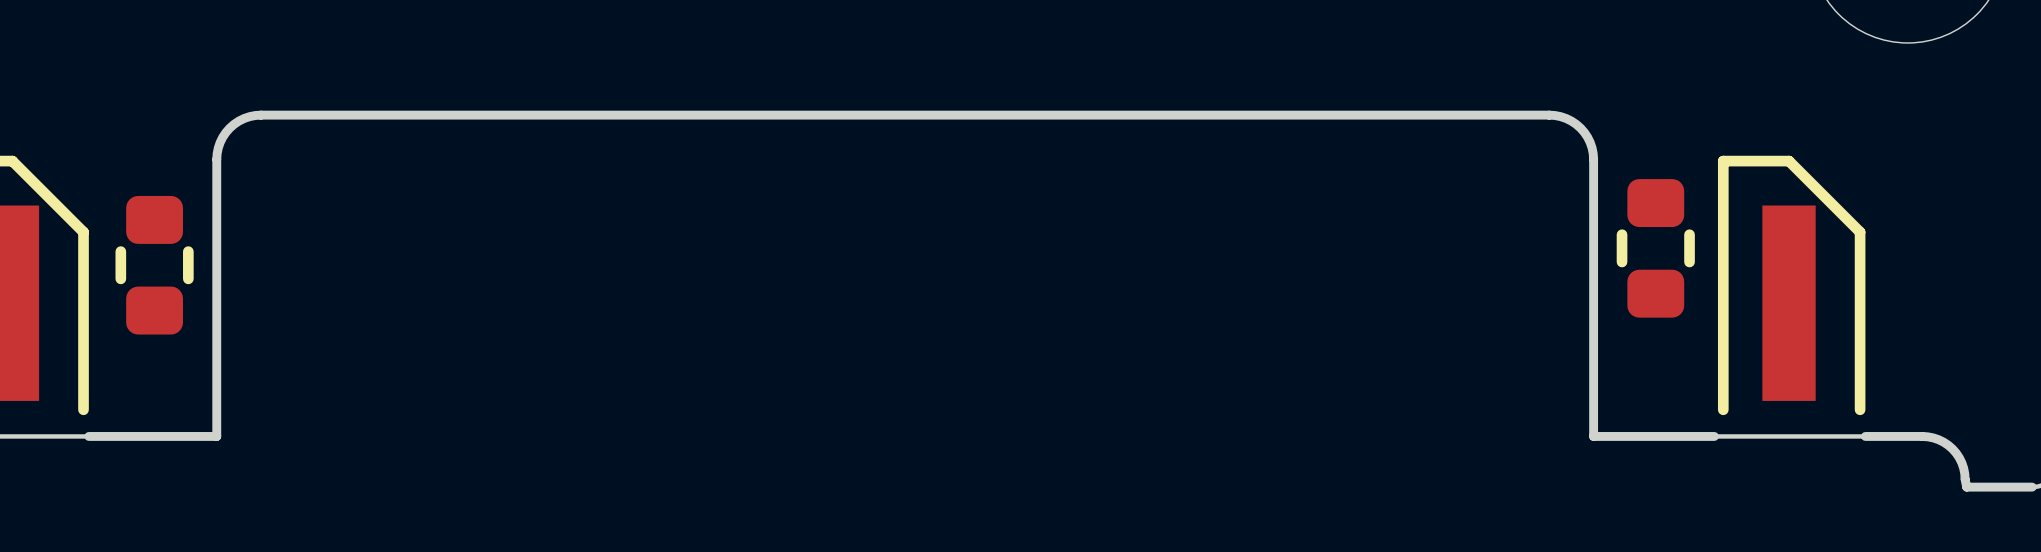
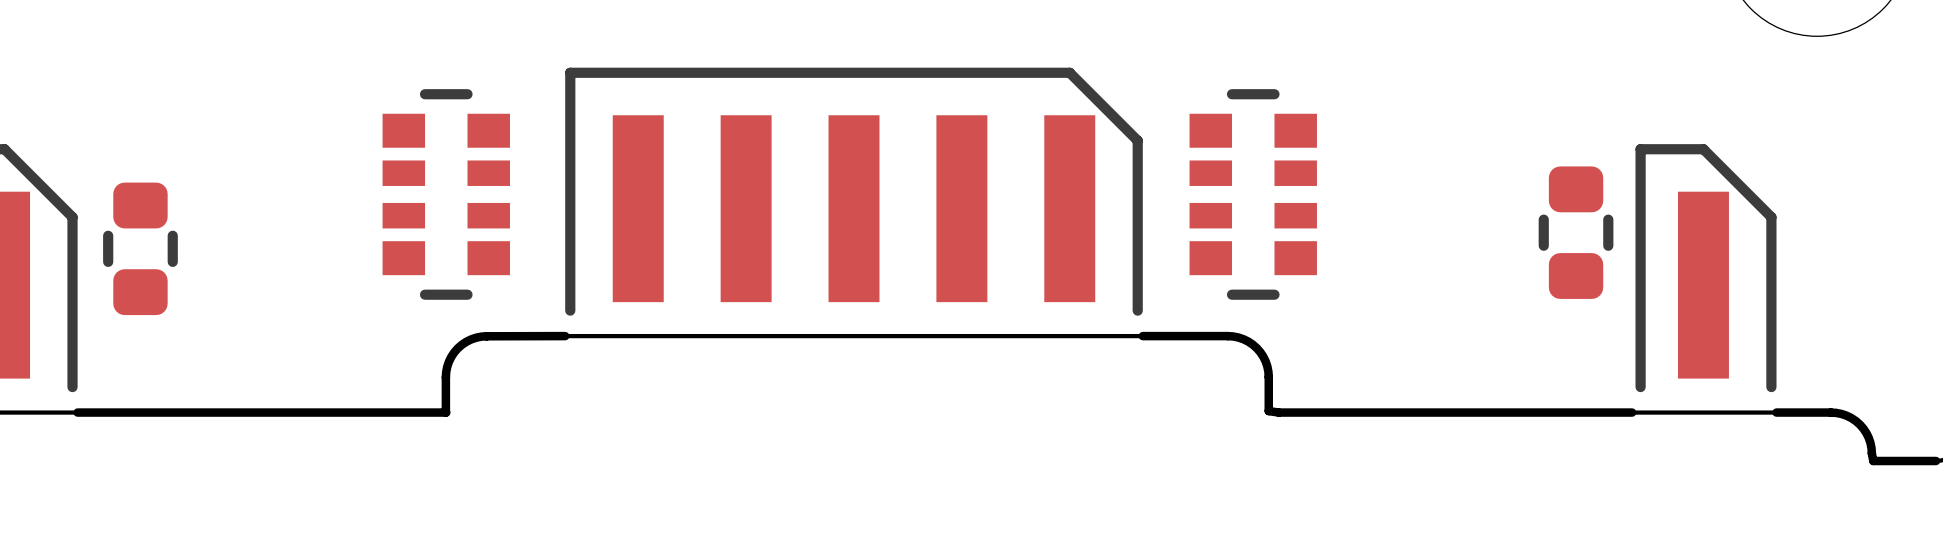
part: none -> (446, 194)
part: none -> (1253, 194)
part: none -> (854, 202)
board edge: none -> (565, 336) (486, 336) (466, 341) (454, 352) (447, 366) (445, 412) (199, 412)
board edge: (216, 436) (217, 153) (220, 142) (229, 128) (244, 118) (261, 115) (1549, 115) (1560, 116) (1571, 121) (1580, 128) (1590, 142) (1593, 153) (1593, 436) -> (1142, 336) (1227, 336) (1248, 341) (1260, 352) (1267, 366) (1268, 411) (1516, 412)

